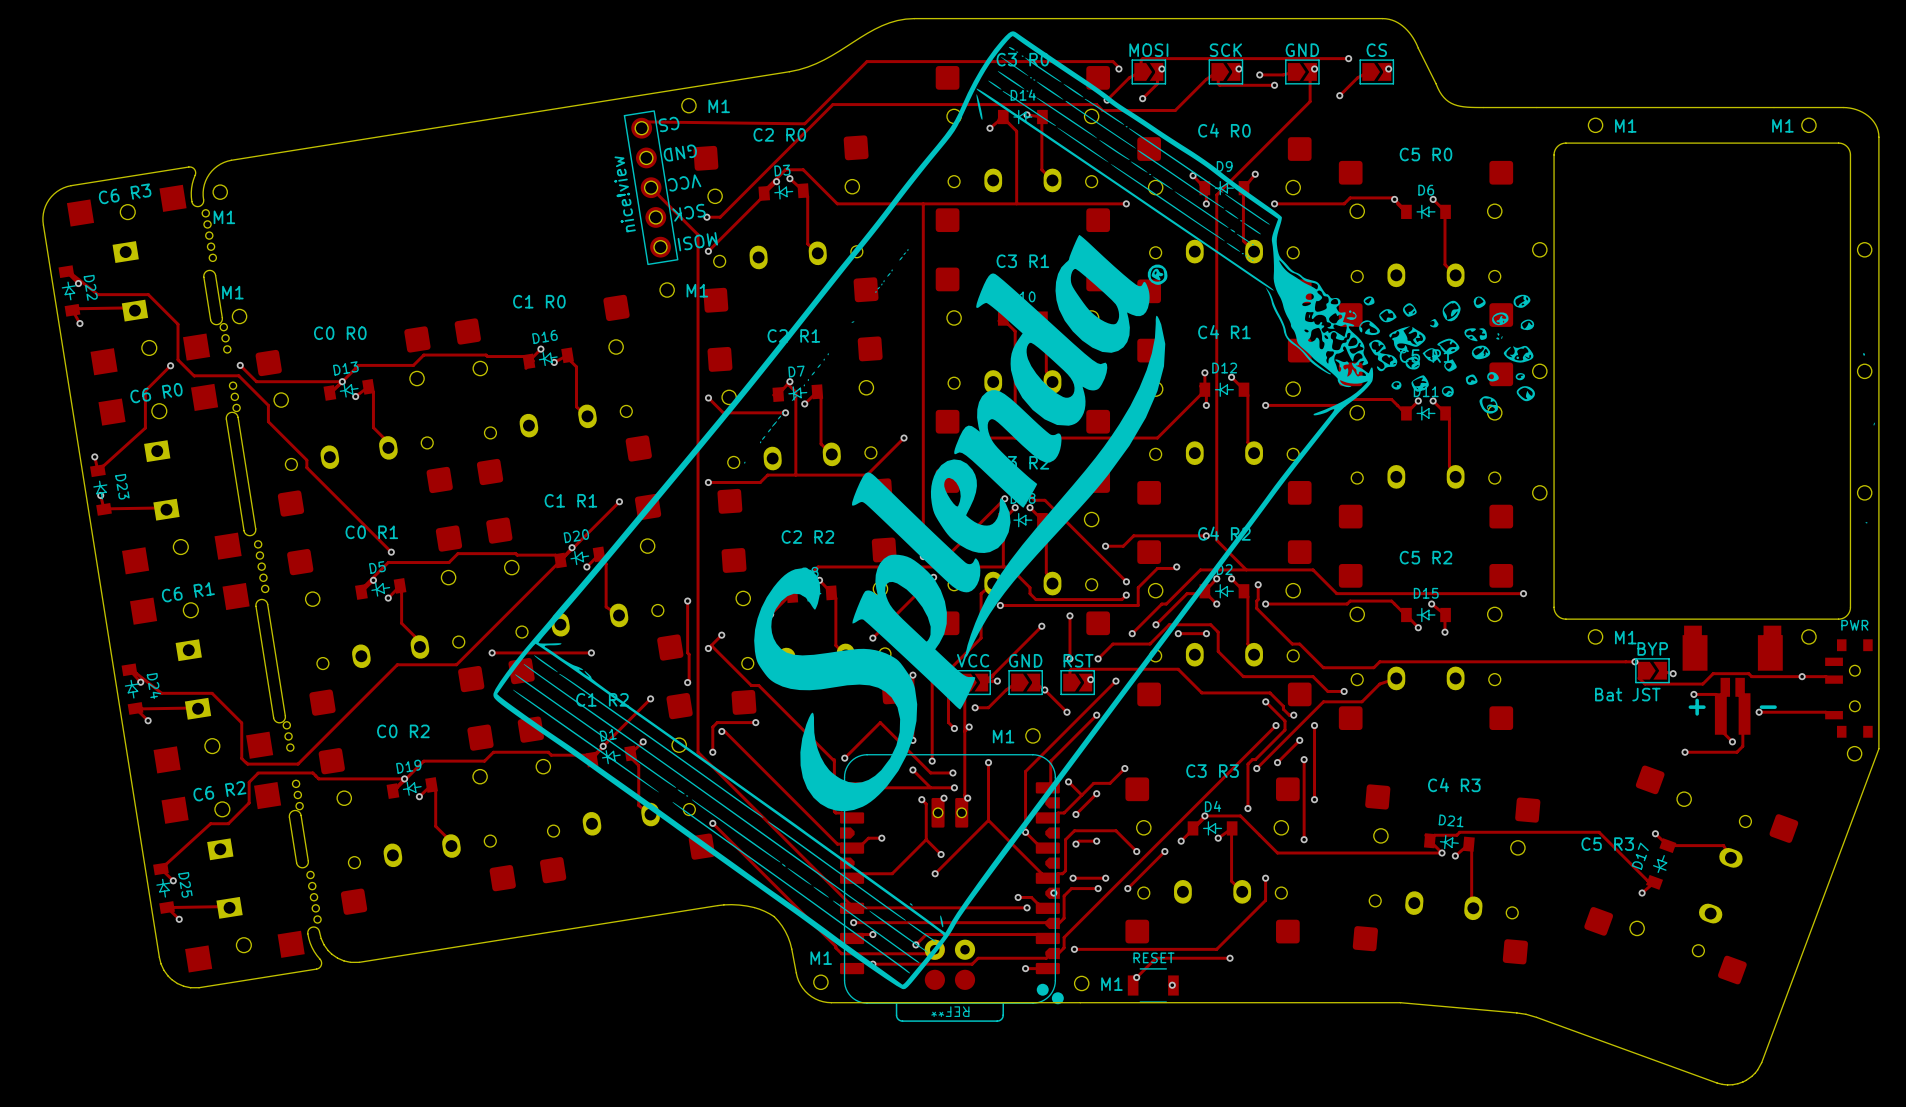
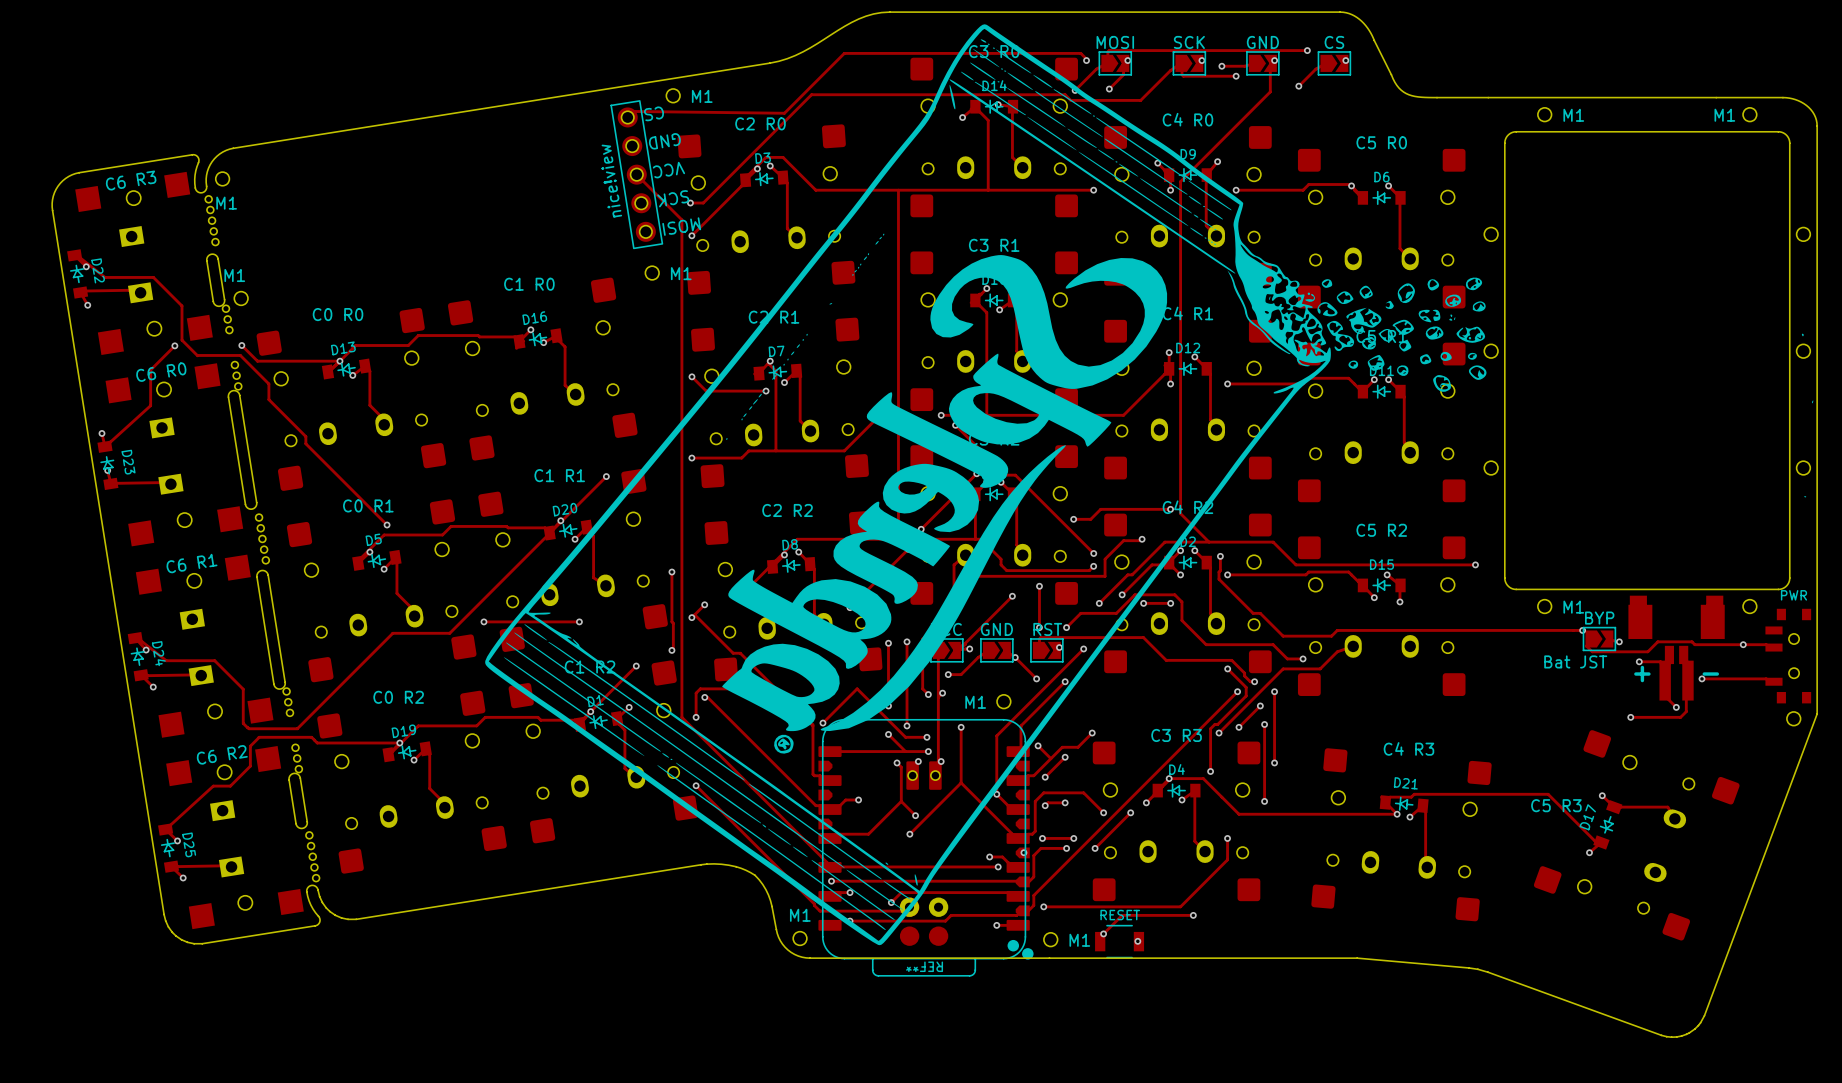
drawing: [754, 234, 1168, 812] -> none
drawing: none -> [722, 255, 1168, 754]

